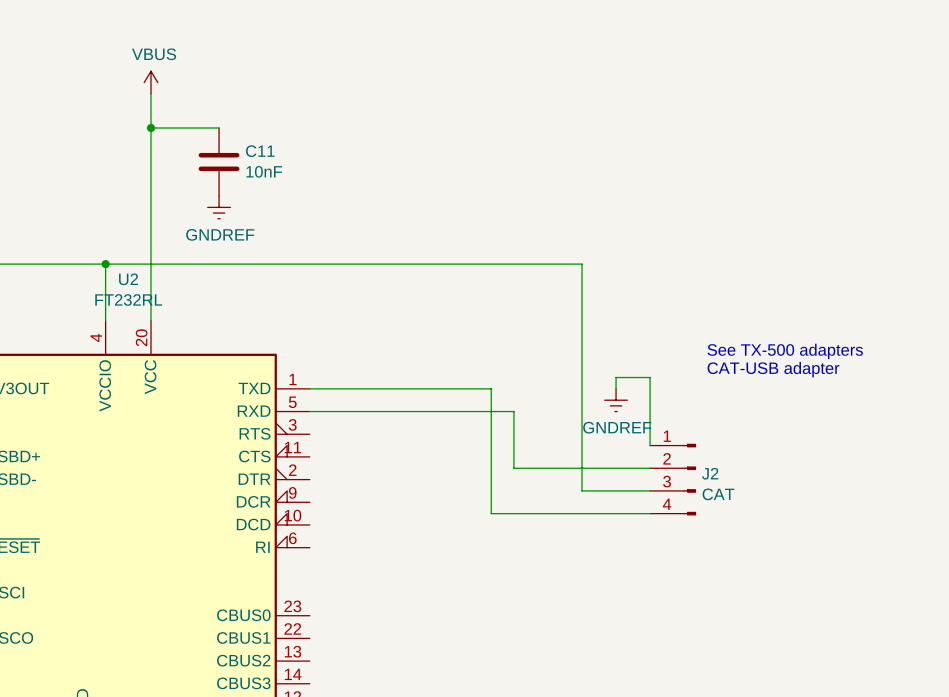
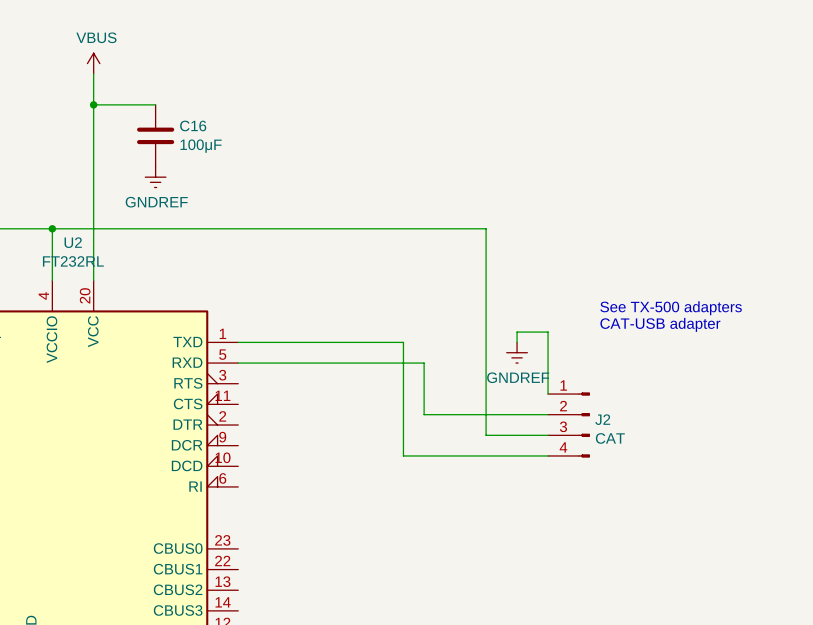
C11 name: C11 (260, 151) -> C16 (193, 125)
C11 value: 10nF (264, 171) -> 100μF (201, 146)

